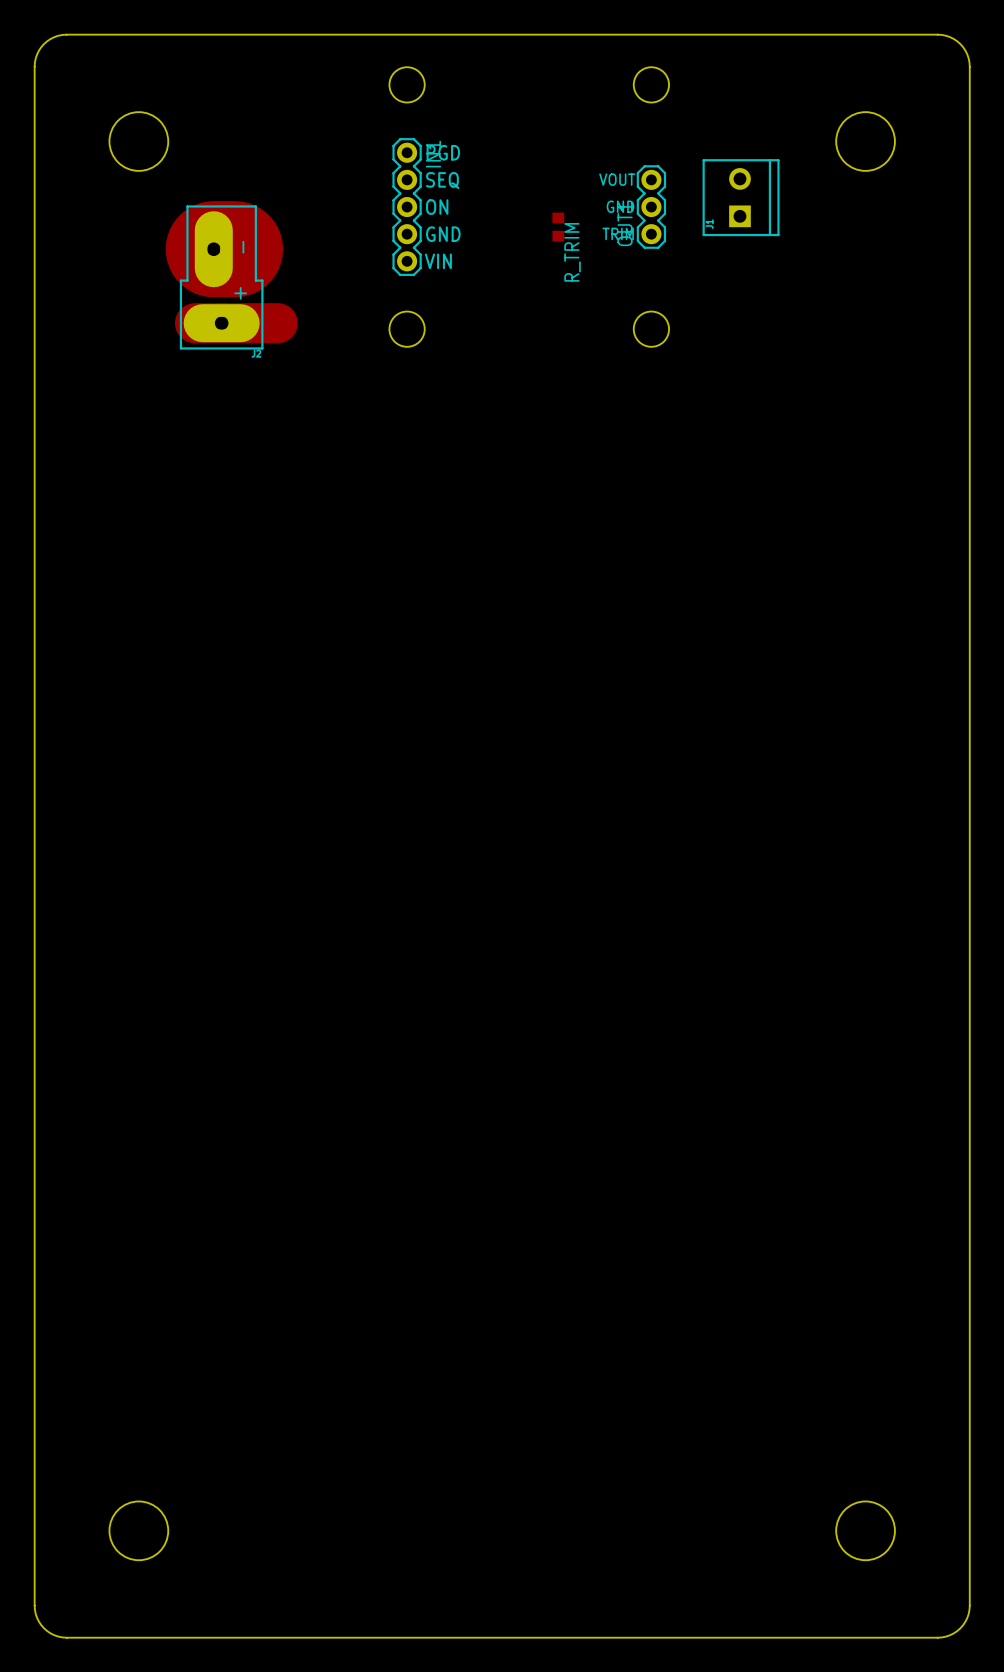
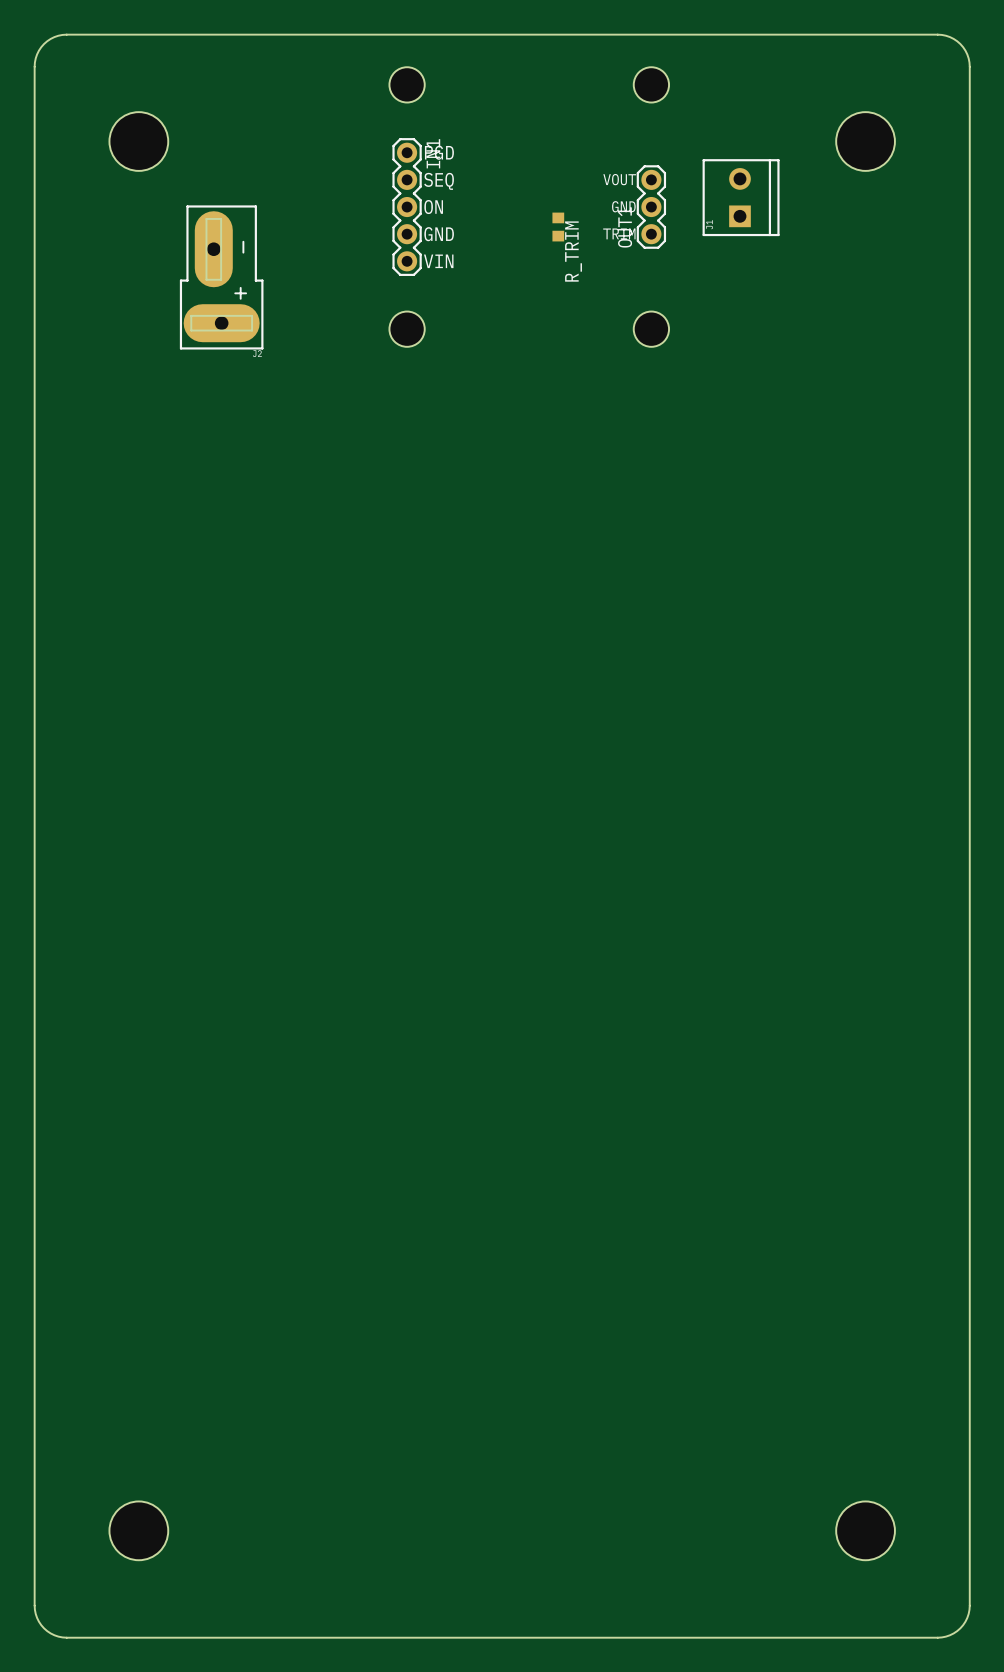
track: (240, 248) (213, 249) -> none
track: (194, 323) (277, 323) -> none

